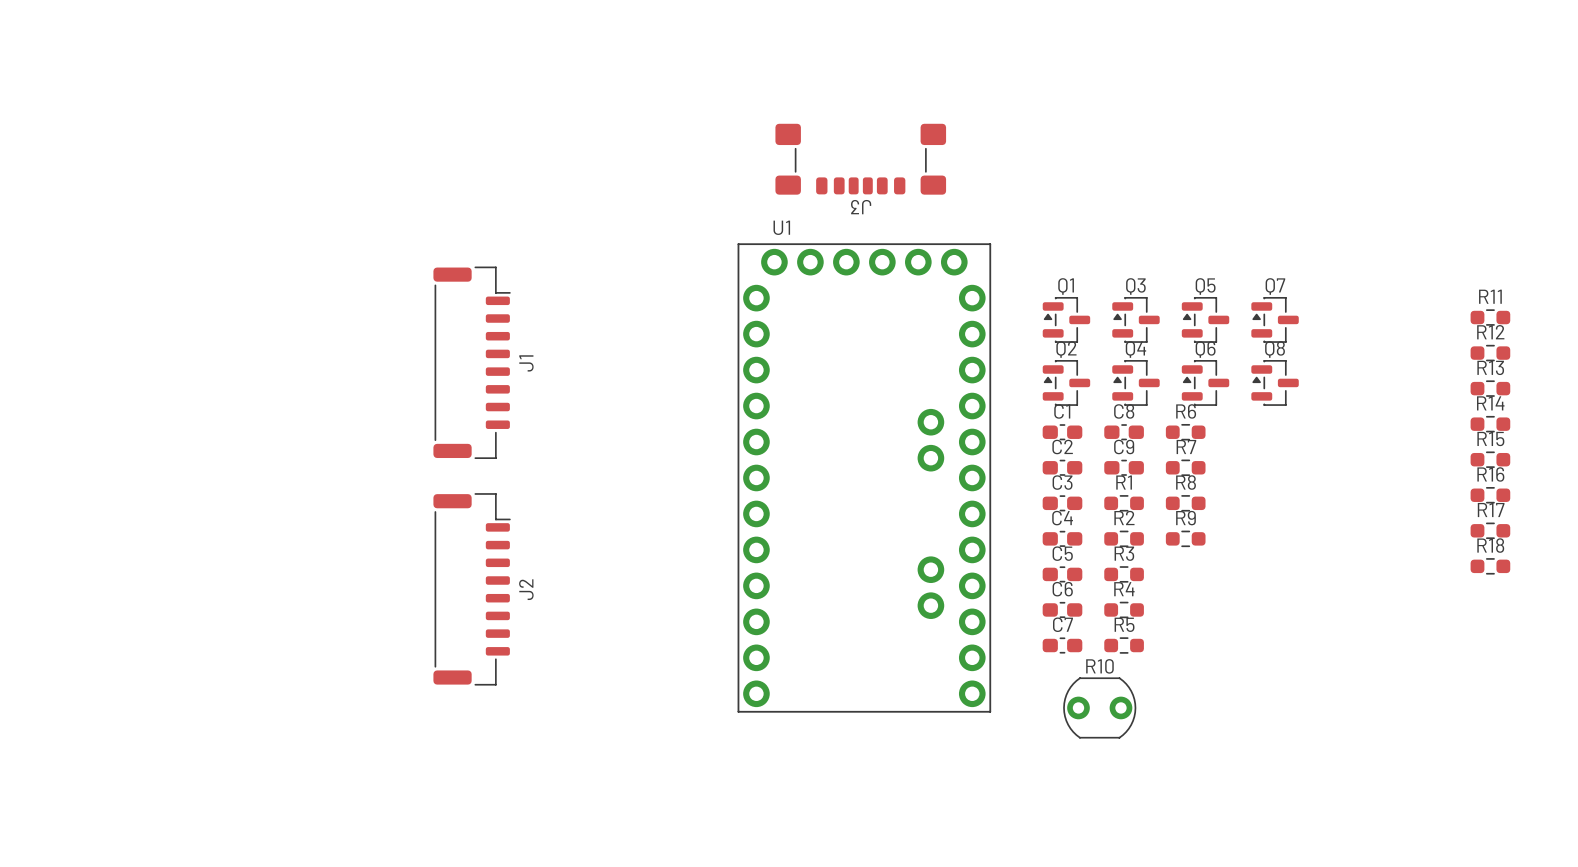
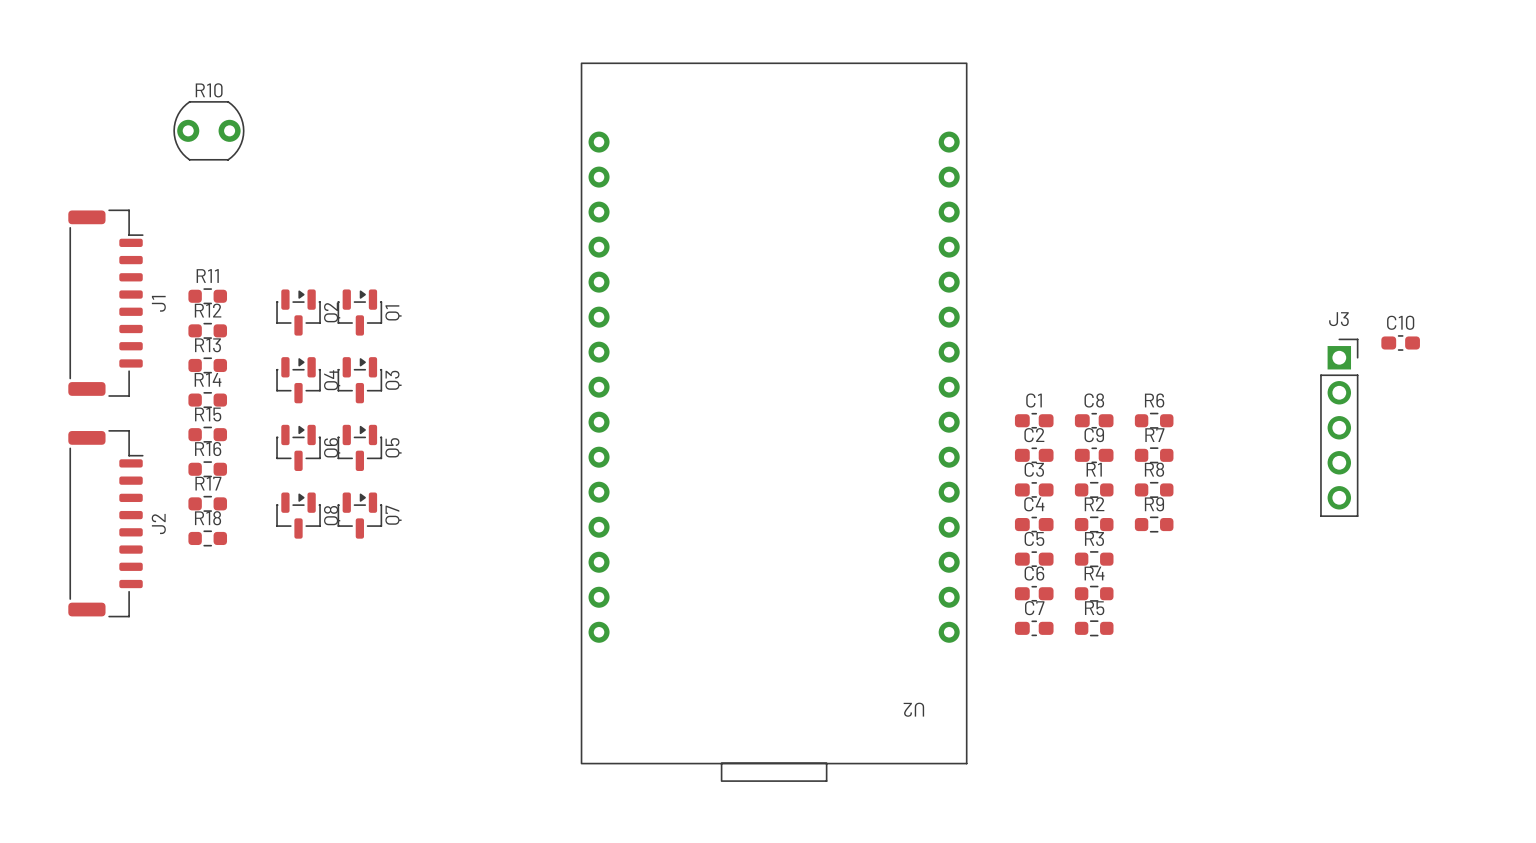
J3 footprint: [775, 123, 947, 195] -> [1320, 338, 1359, 517]
J3 name position: J3 (861, 207) -> J3 (1338, 319)
R11 position: (1490, 317) -> (207, 296)
Q1 rotation: 0° (1066, 319) -> 90° clockwise (359, 312)
Q1 position: (1066, 319) -> (359, 312)
Q3 rotation: 0° (1135, 319) -> 90° clockwise (359, 380)
Q3 position: (1135, 319) -> (359, 380)
Q5 rotation: 0° (1205, 319) -> 90° clockwise (359, 447)
Q5 position: (1205, 319) -> (359, 447)
Q7 rotation: 0° (1275, 319) -> 90° clockwise (359, 515)
Q7 position: (1275, 319) -> (359, 515)
C10: none -> (1400, 342)
R12 position: (1490, 353) -> (207, 330)
J1 position: (472, 362) -> (105, 303)
Q2 rotation: 0° (1066, 382) -> 90° clockwise (298, 312)
Q2 position: (1066, 382) -> (298, 312)
Q4 rotation: 0° (1135, 382) -> 90° clockwise (298, 380)
Q4 position: (1135, 382) -> (298, 380)
Q6 rotation: 0° (1205, 382) -> 90° clockwise (298, 447)
Q6 position: (1205, 382) -> (298, 447)
Q8 rotation: 0° (1275, 382) -> 90° clockwise (298, 515)
Q8 position: (1275, 382) -> (298, 515)
R13 position: (1490, 388) -> (207, 365)
R14 position: (1490, 424) -> (207, 400)
U2: none -> (774, 422)
R15 position: (1490, 459) -> (207, 434)
U1: (864, 477) -> none
R16 position: (1490, 495) -> (207, 469)
R17 position: (1490, 530) -> (207, 503)
R18 position: (1490, 566) -> (207, 538)
J2 position: (472, 589) -> (105, 523)
R10 position: (1099, 707) -> (208, 130)

